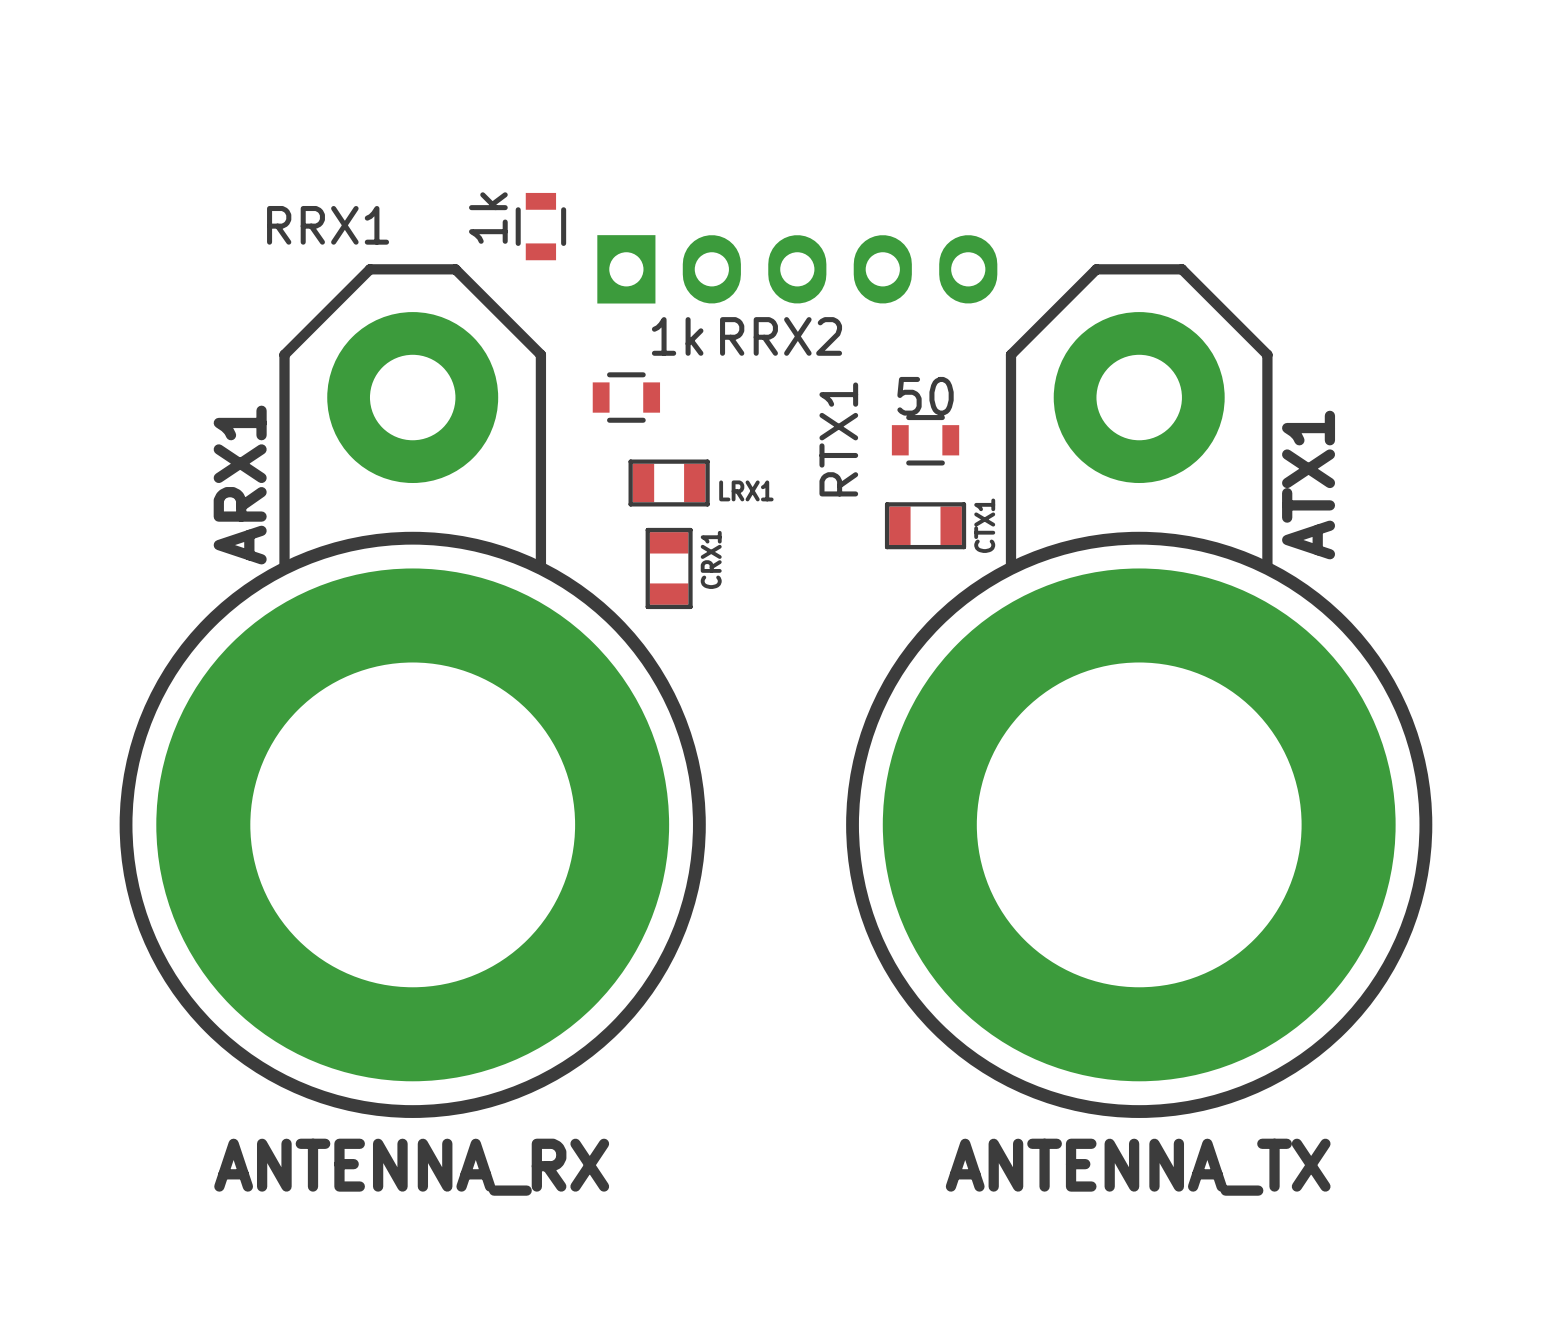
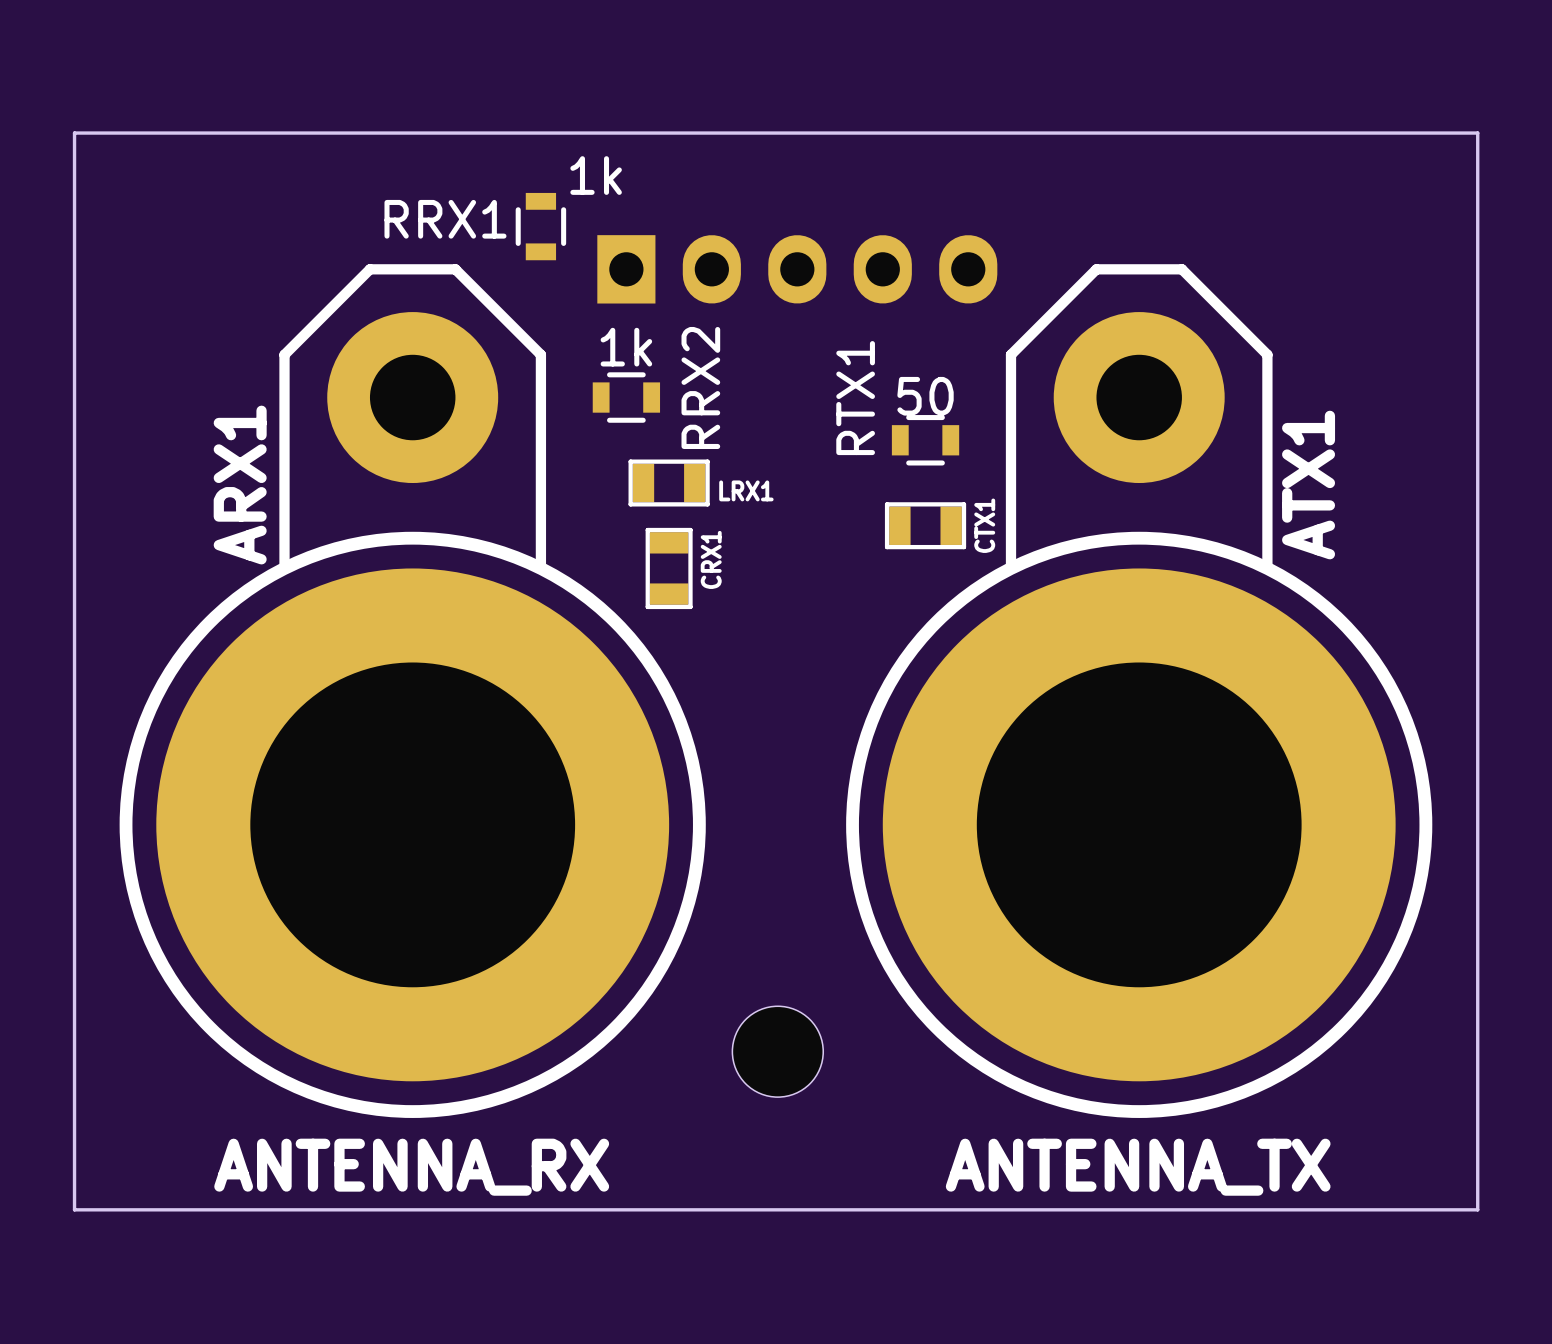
board edge: none -> (74, 133) (74, 1209) (1477, 1209) (1477, 133) (74, 133)
RRX1 value rotation: 0° (488, 218) -> 90° clockwise (596, 175)
RRX1 value position: 1k (488, 218) -> 1k (596, 175)
RRX1 name position: RRX1 (328, 225) -> RRX1 (445, 219)
RRX2 value position: 1k (677, 336) -> 1k (626, 347)
RRX2 name rotation: 0° (781, 336) -> 90° counterclockwise (700, 387)
RTX1 name position: RTX1 (838, 439) -> RTX1 (855, 398)
part: none -> (777, 1051)

